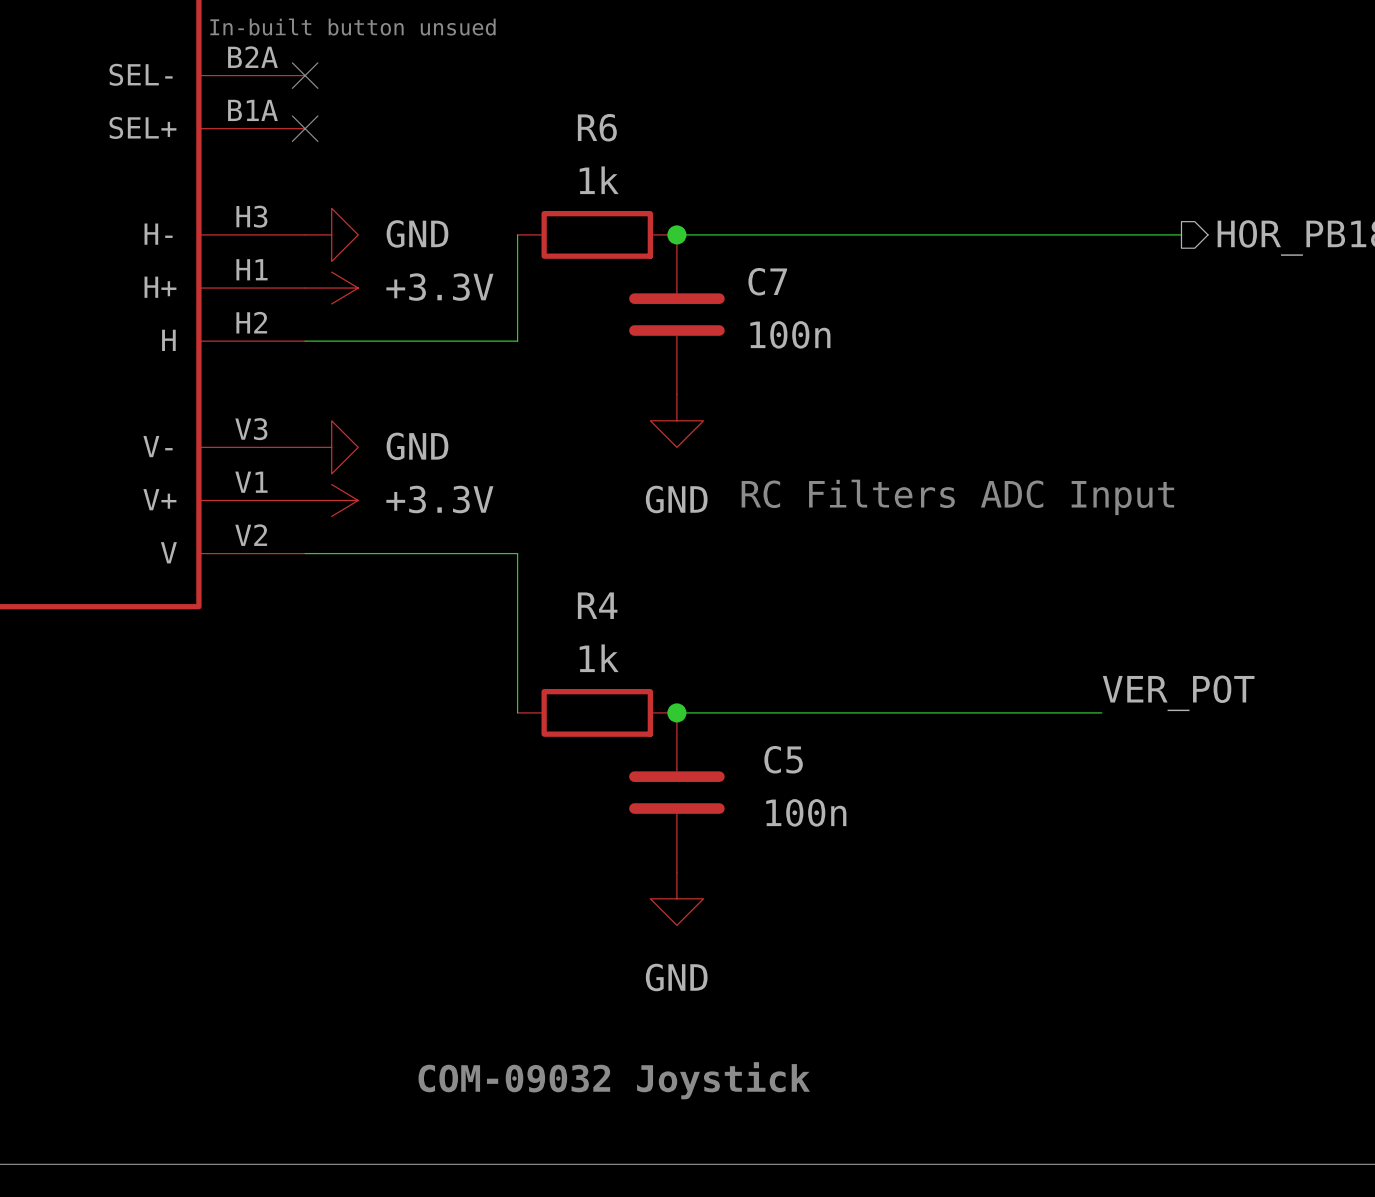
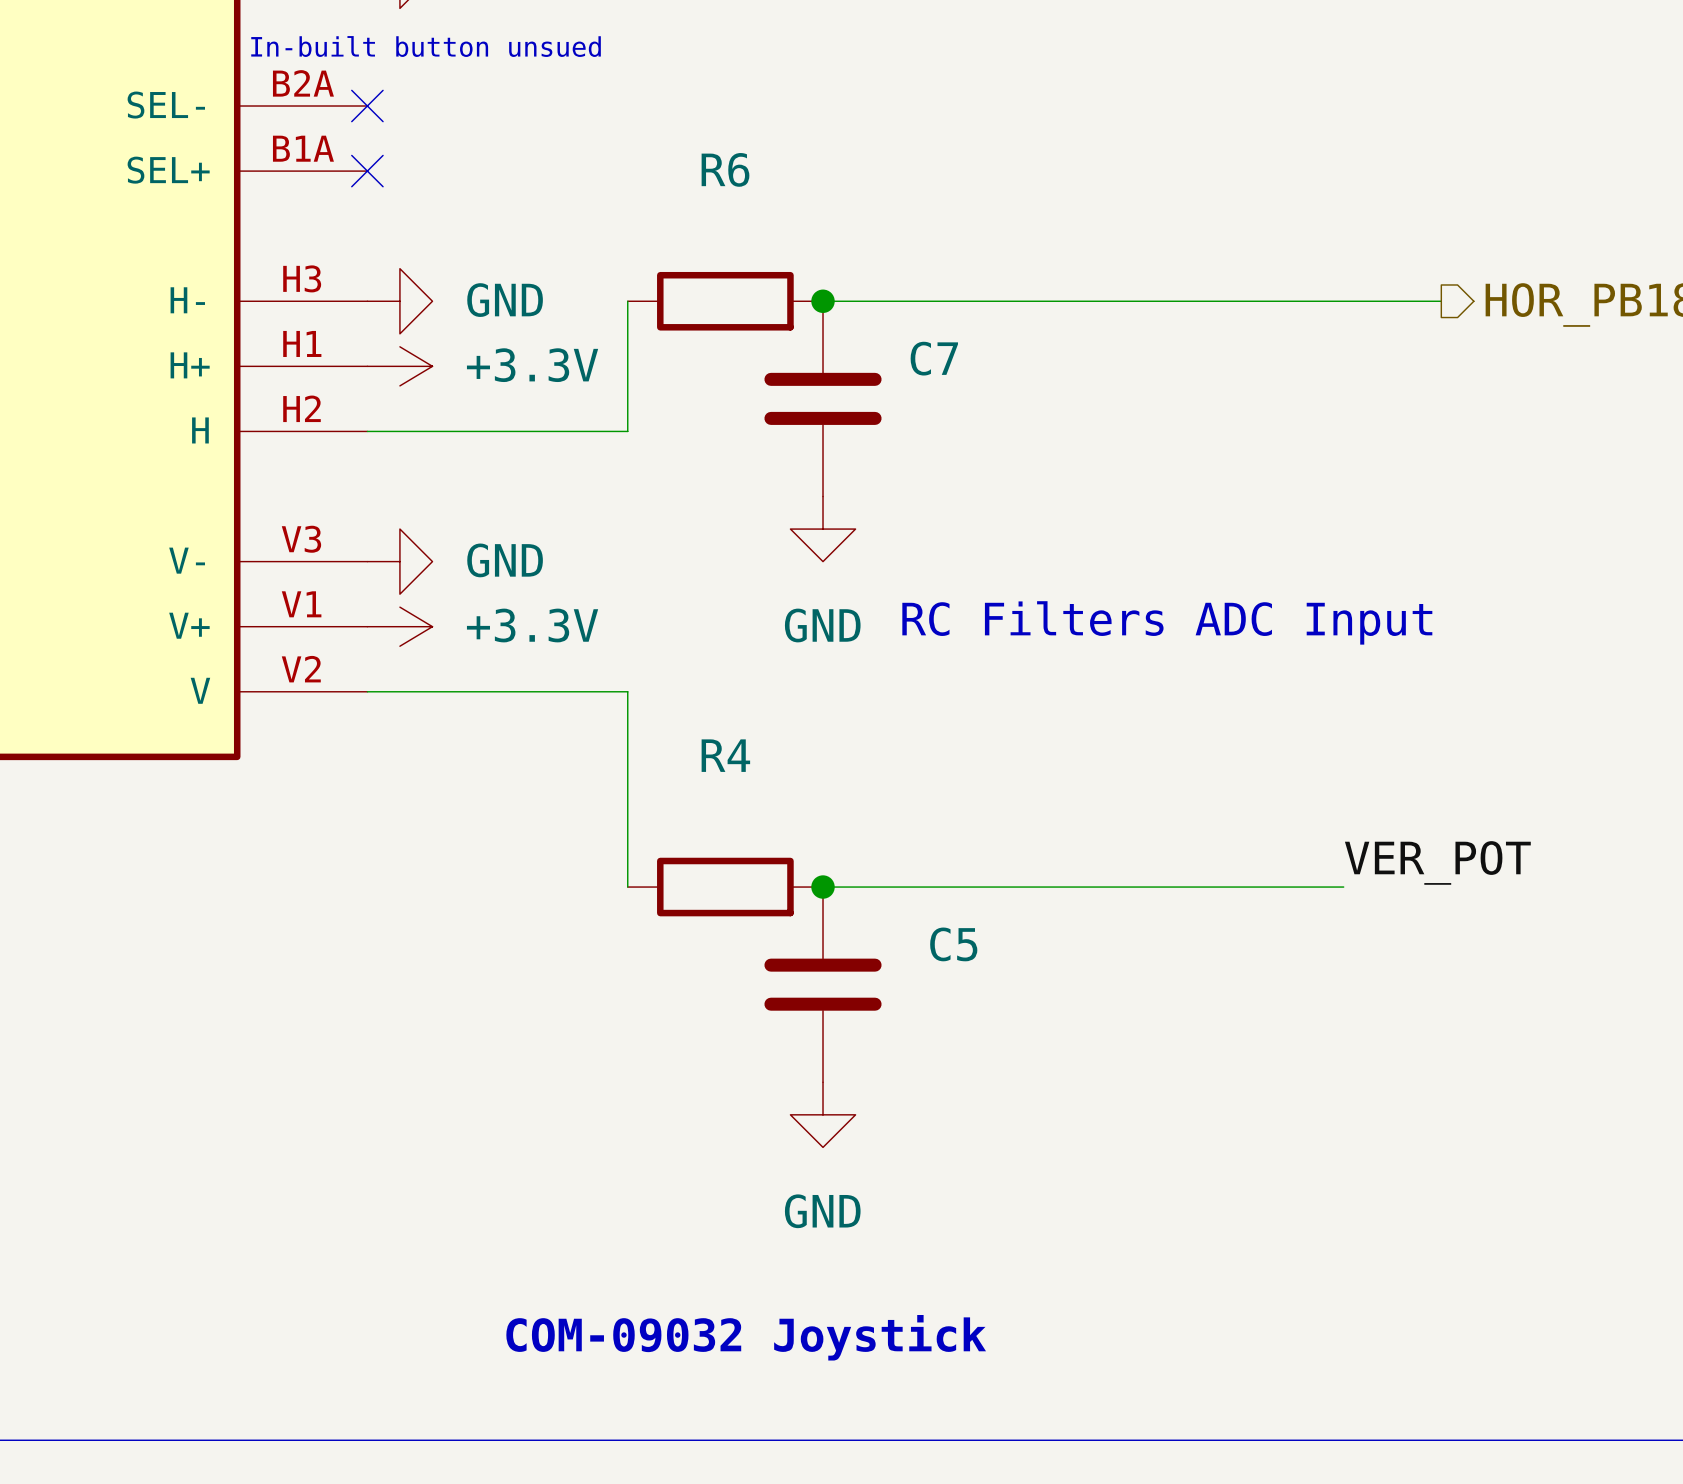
R6 value: 1k (599, 180) -> none
C7 value: 100n (790, 334) -> none
R4 value: 1k (599, 658) -> none
C5 value: 100n (806, 812) -> none

